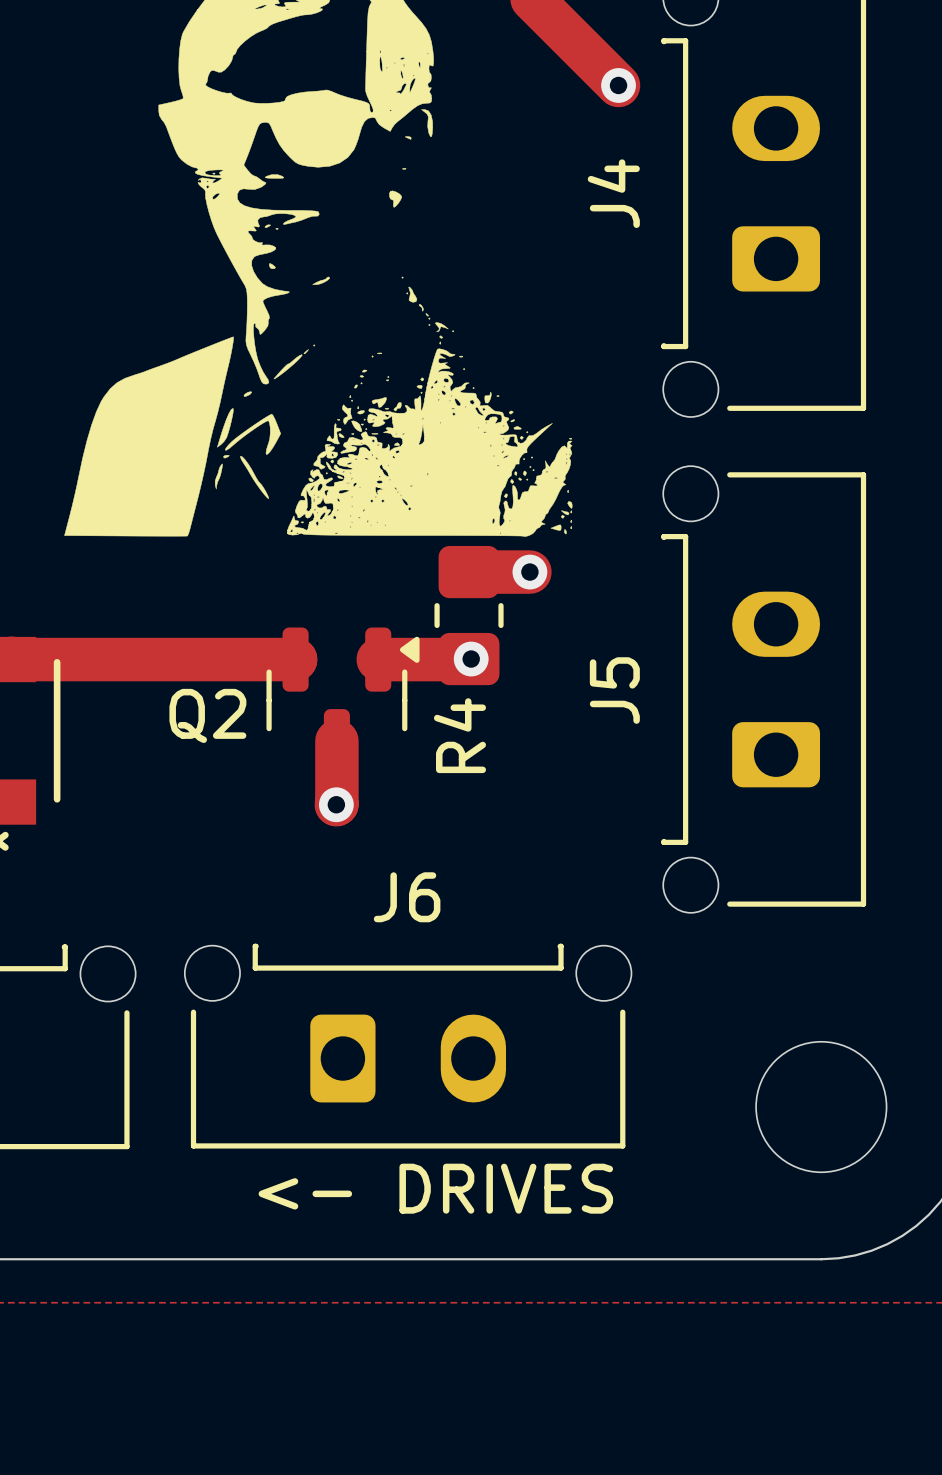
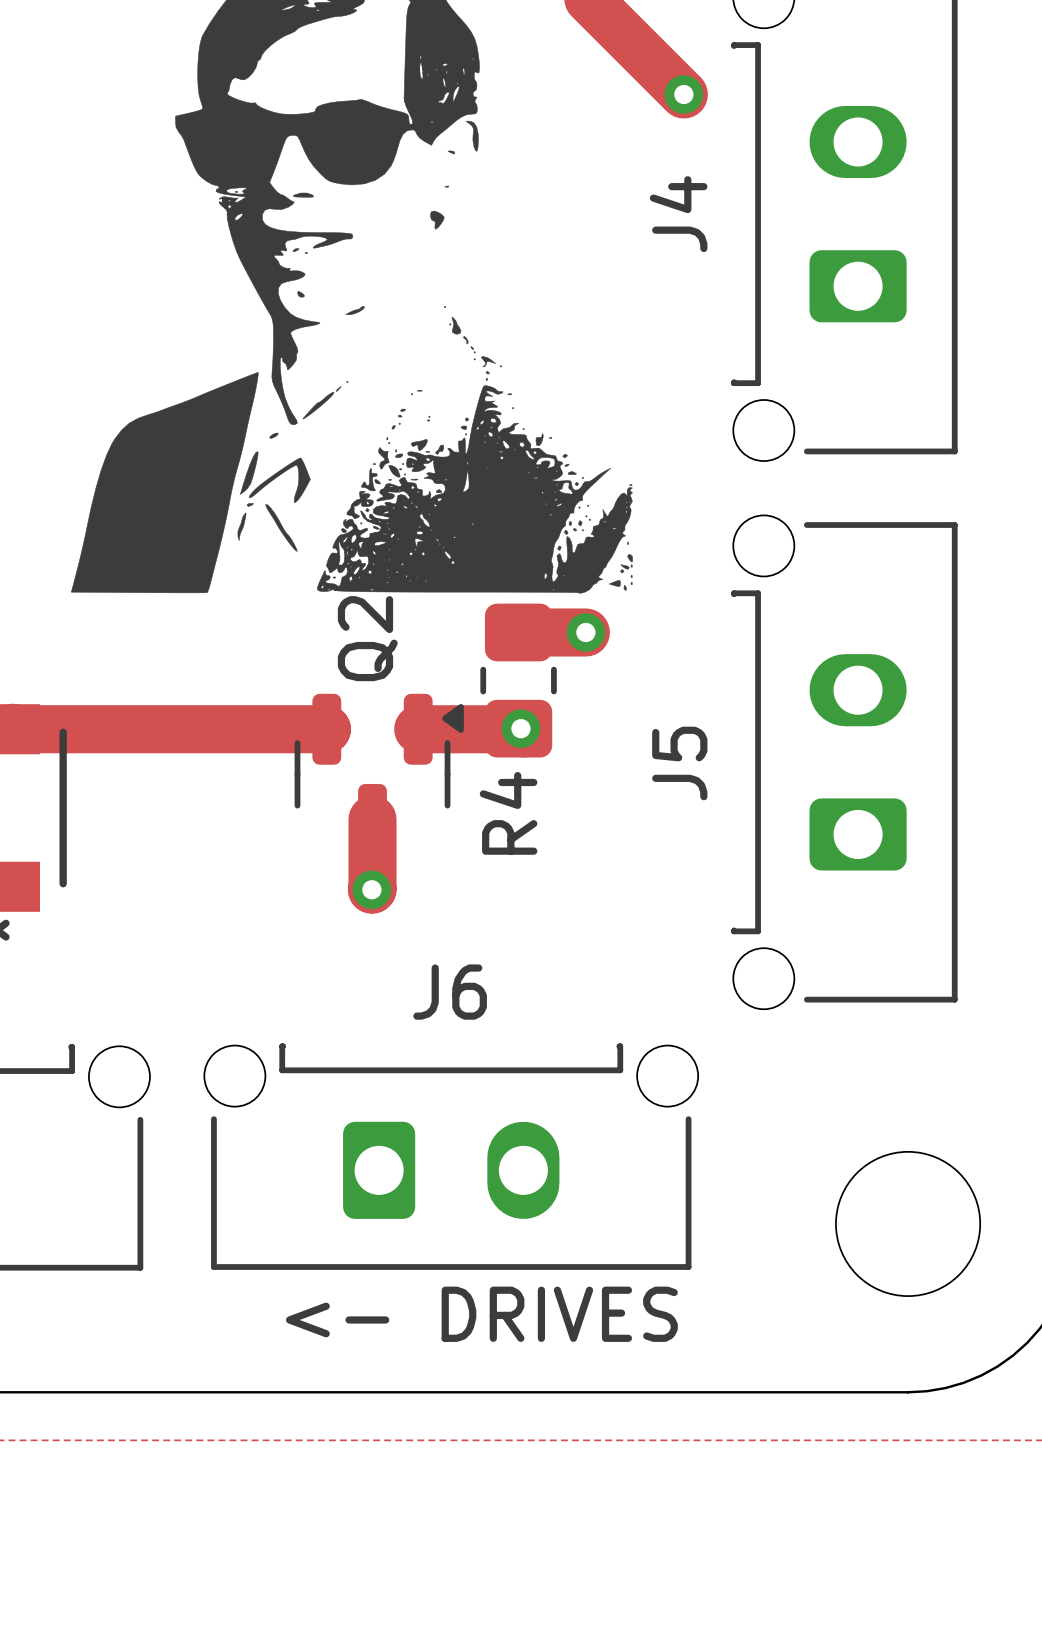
Q2 name rotation: 0° (207, 715) -> 90° counterclockwise (367, 638)
Q2 name position: Q2 (207, 715) -> Q2 (367, 638)

